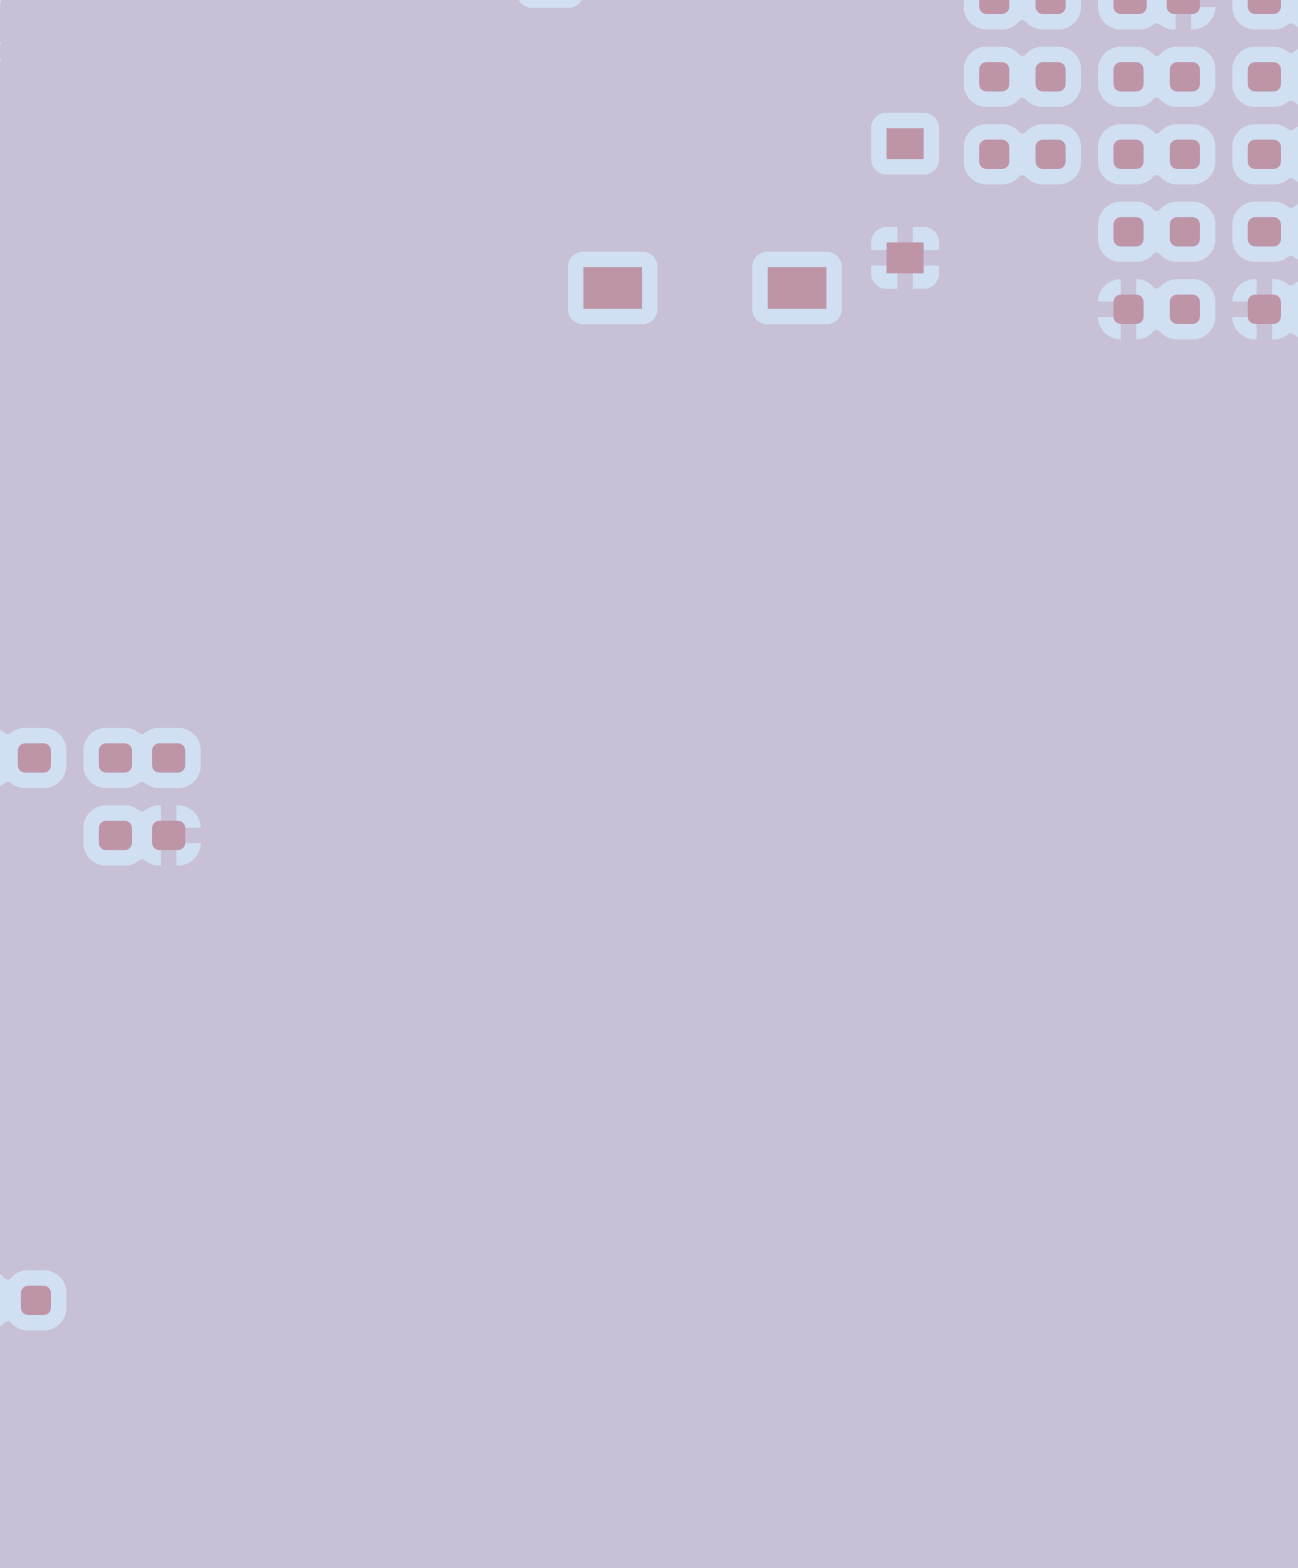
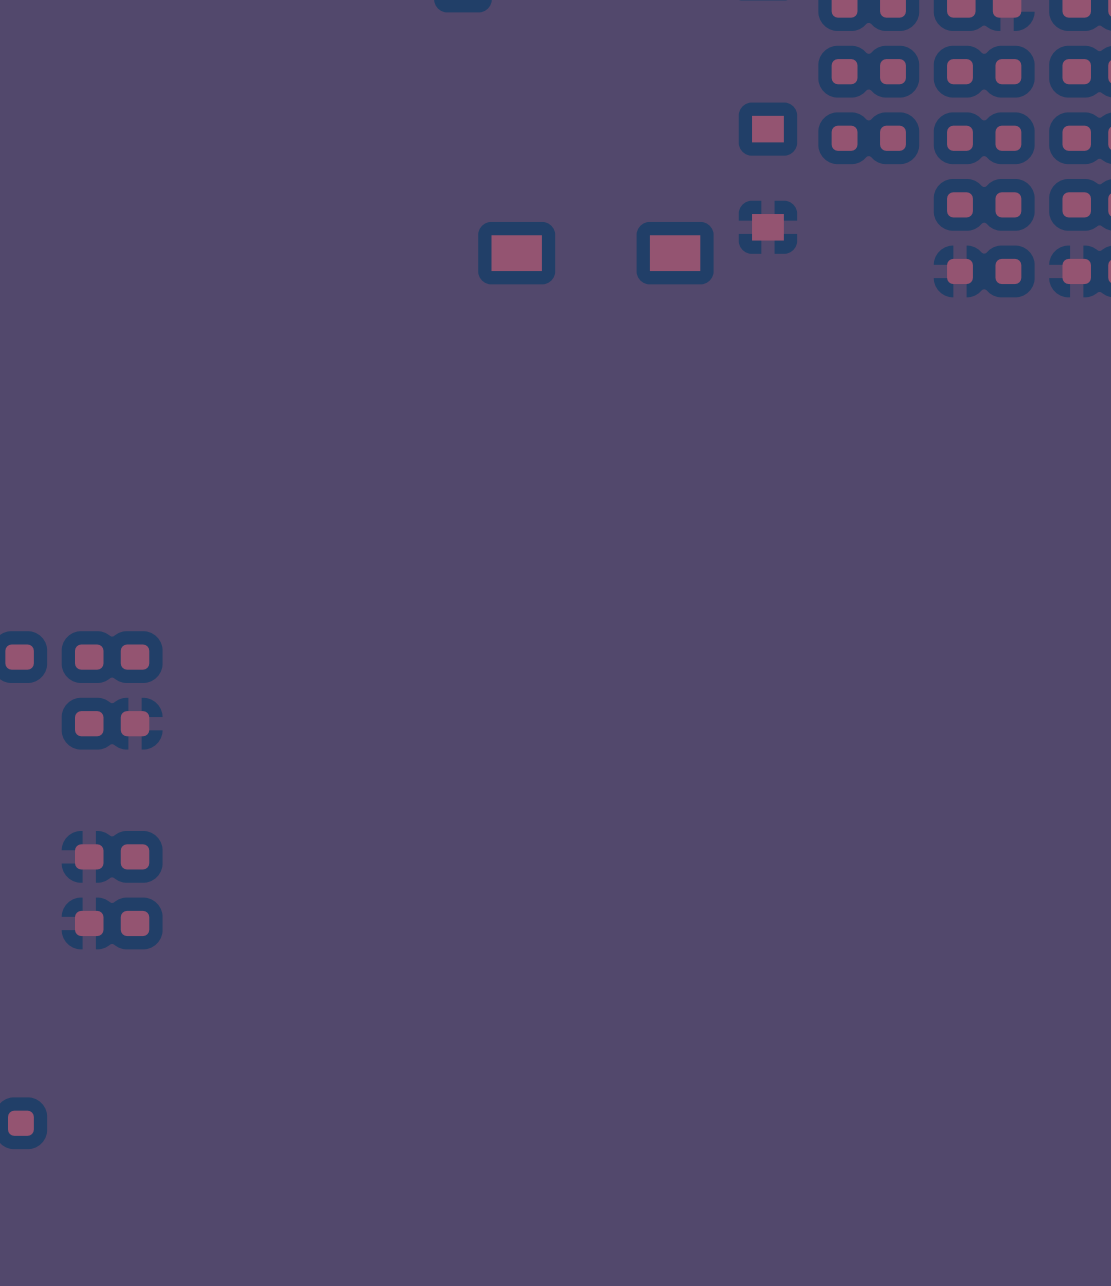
part: none -> (112, 856)
part: none -> (112, 923)

